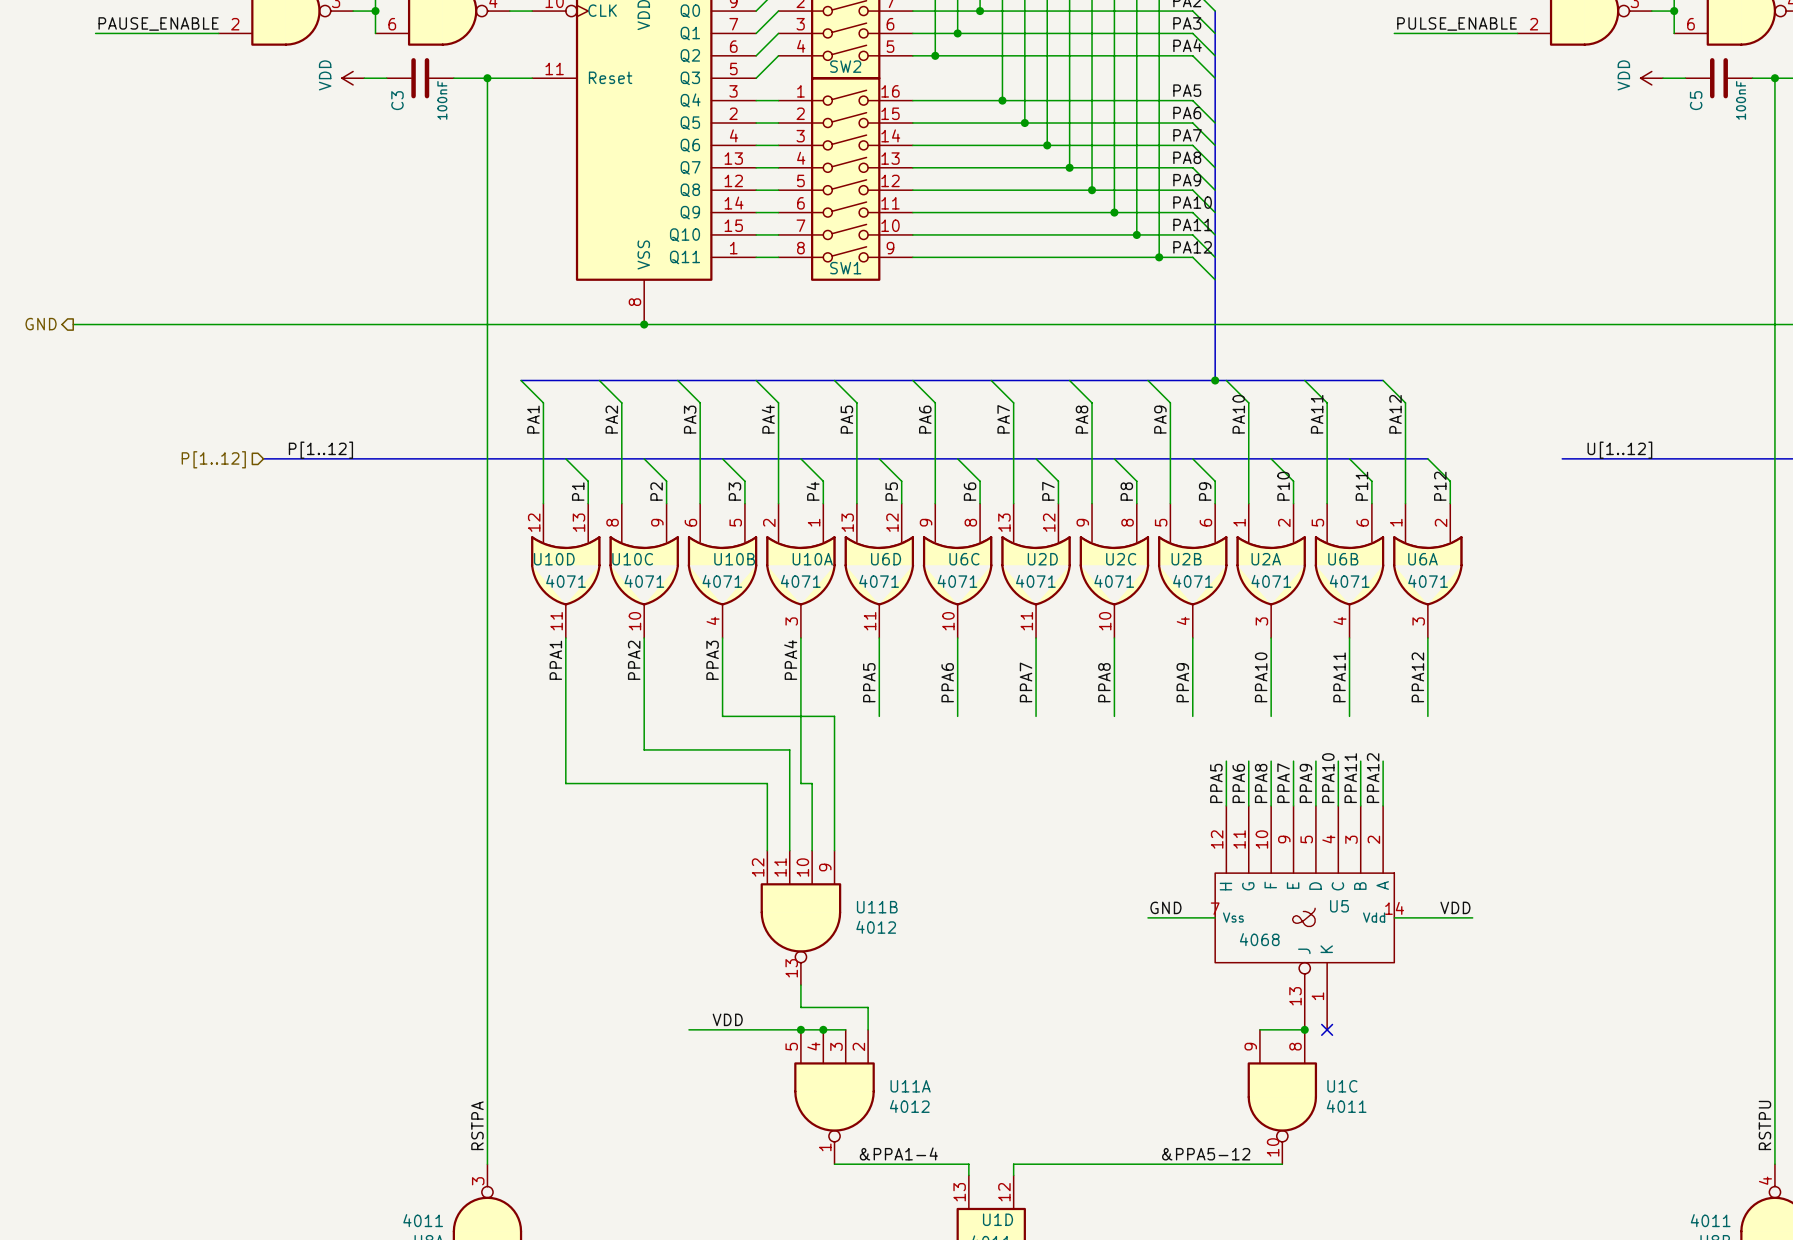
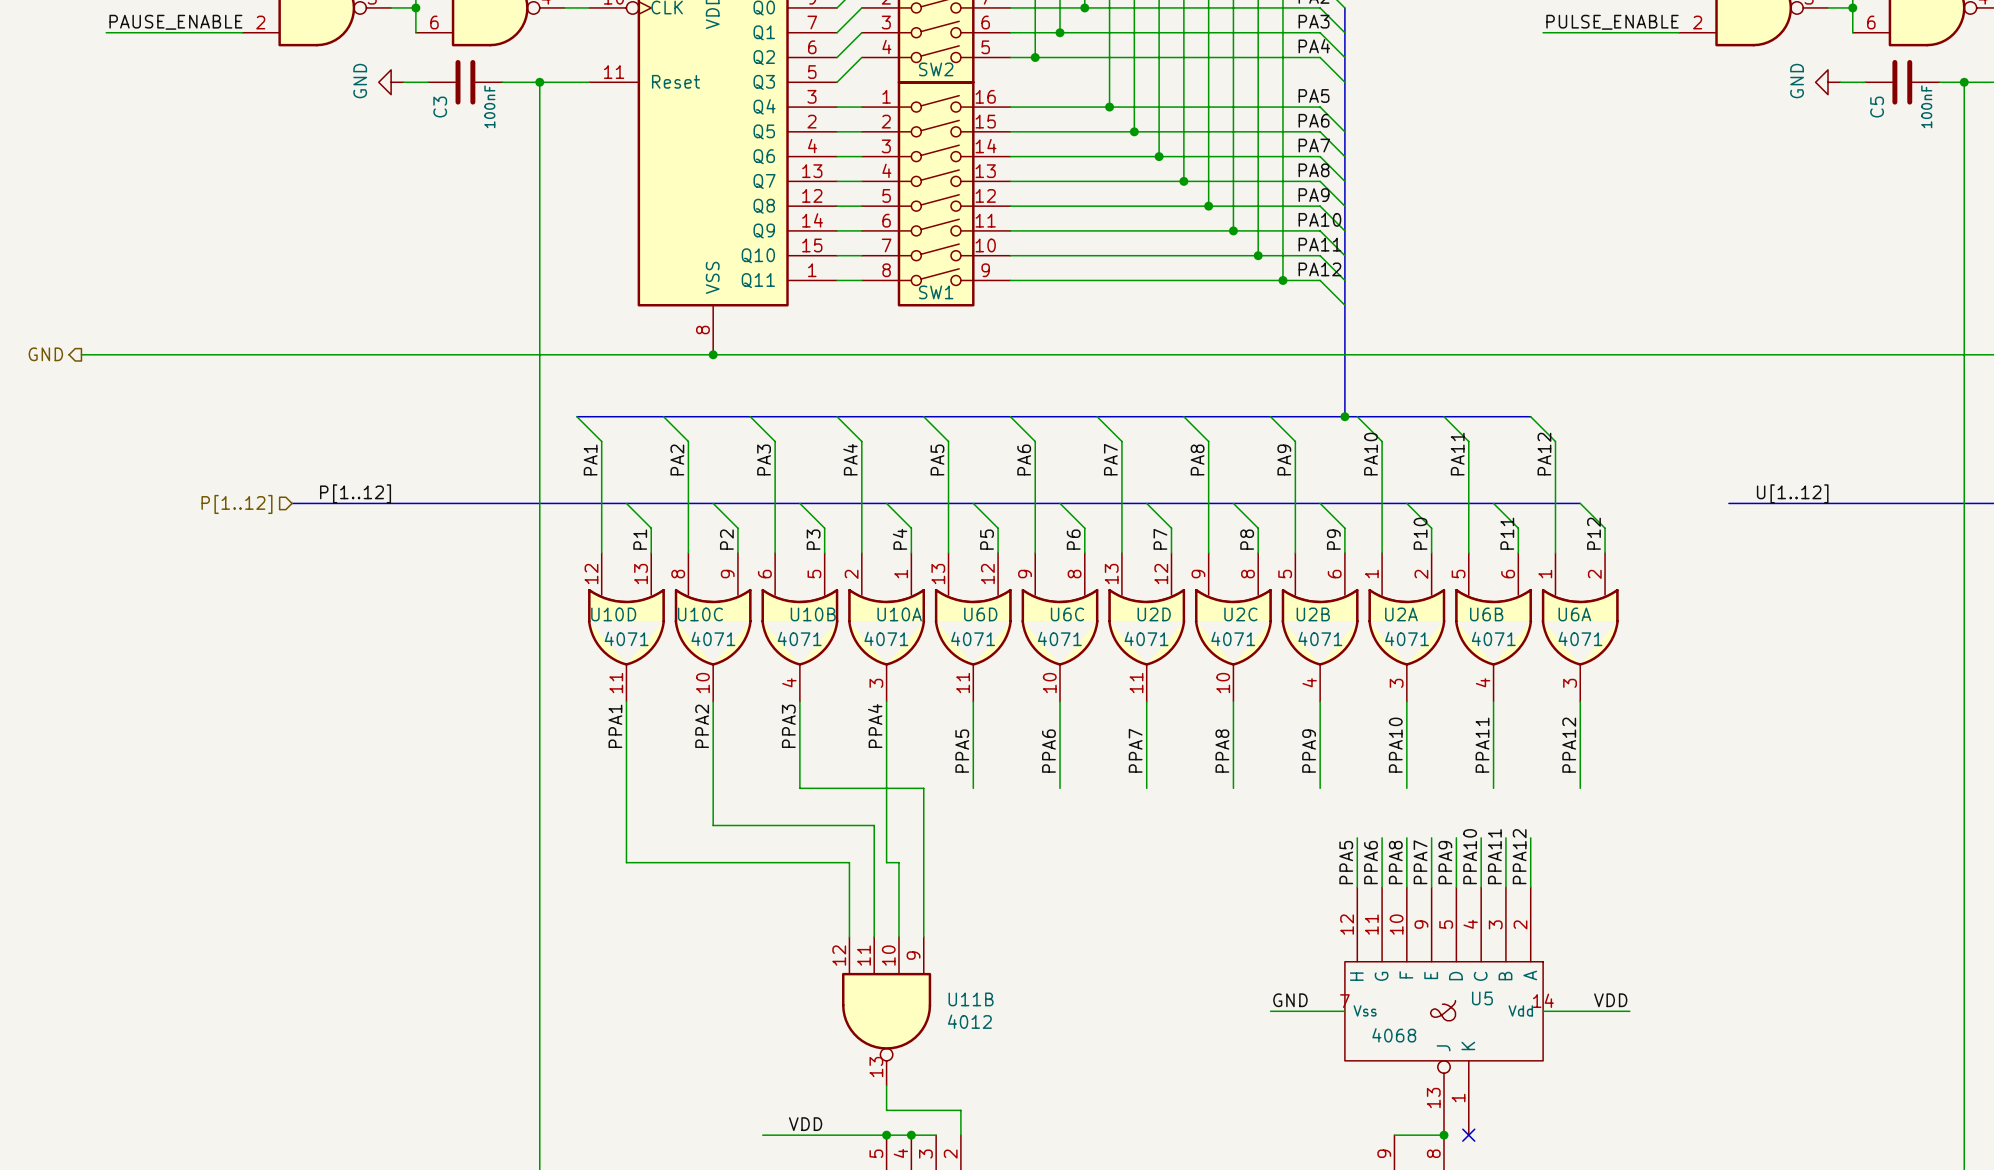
power symbol: VDD (353, 78) -> GND (391, 82)
power symbol: VDD (1651, 78) -> GND (1828, 82)

